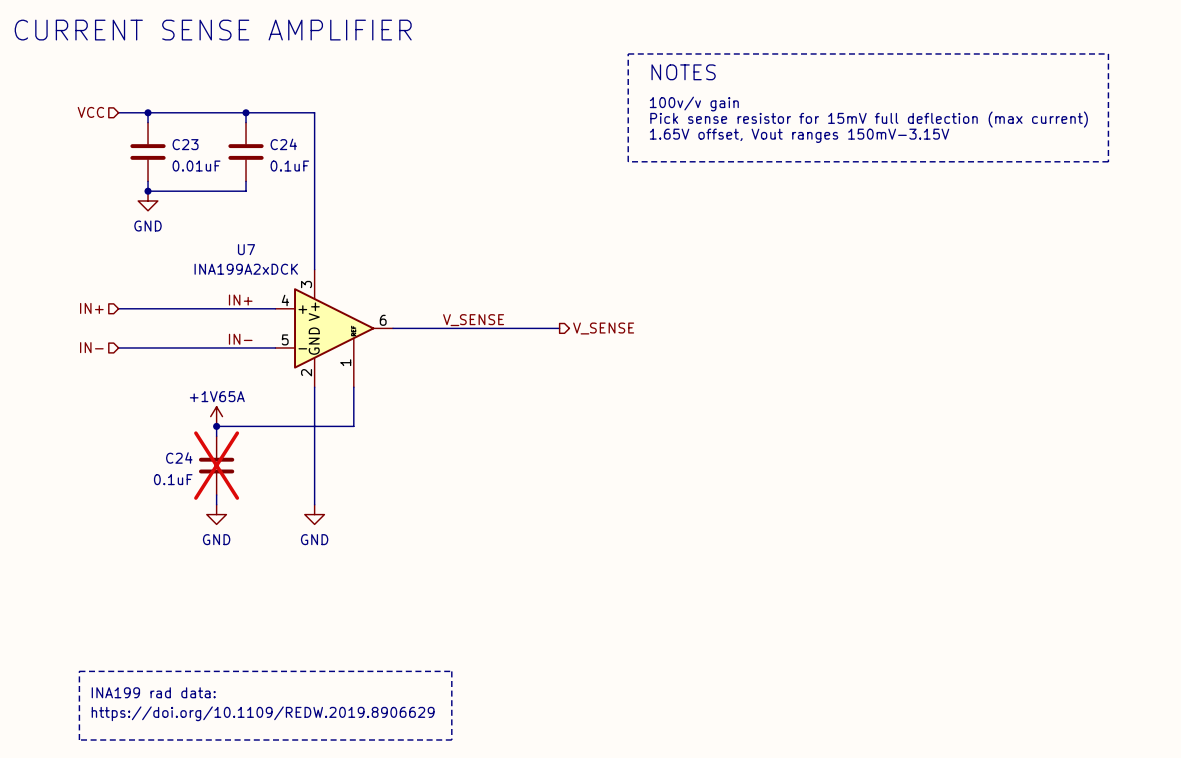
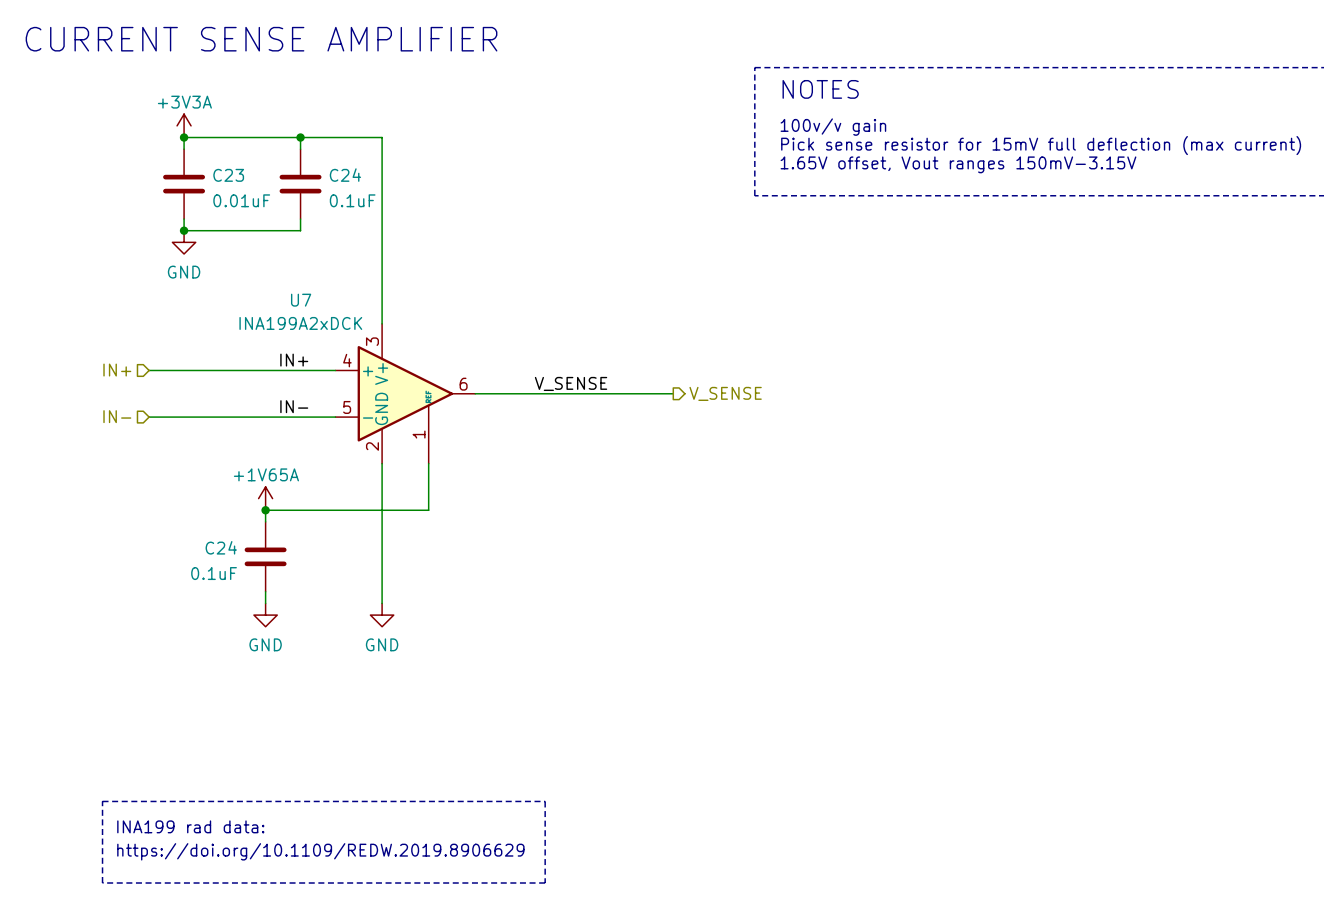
power symbol: none -> +3V3A (184, 125)
hierarchical label: VCC (90, 112) -> none
wire: (118, 112) (148, 112) -> none
C24 do-not-place cross: (216, 465) -> none

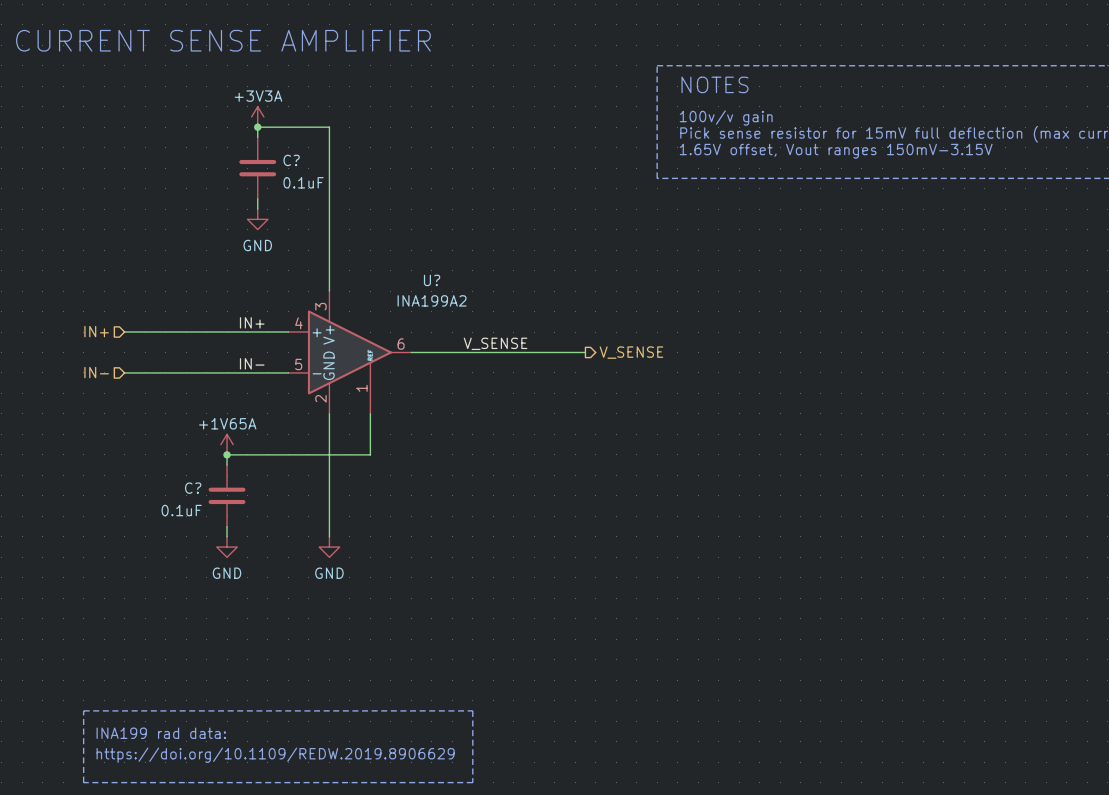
power symbol position: +3V3A (184, 125) -> +3V3A (257, 116)
junction: (184, 137) -> none
wire: (300, 137) (184, 137) (184, 149) -> none
C24 name: C24 (345, 175) -> C? (291, 160)
C23: 0.01uF (184, 184) -> none
wire: (184, 219) (184, 230) (300, 230) -> none
junction: (184, 230) -> none
power symbol position: GND (184, 242) -> GND (257, 219)
U7 name: U7 (301, 300) -> U? (432, 280)
U7 value: INA199A2xDCK (300, 323) -> INA199A2 (432, 300)
C24 name: C24 (221, 547) -> C? (193, 488)

